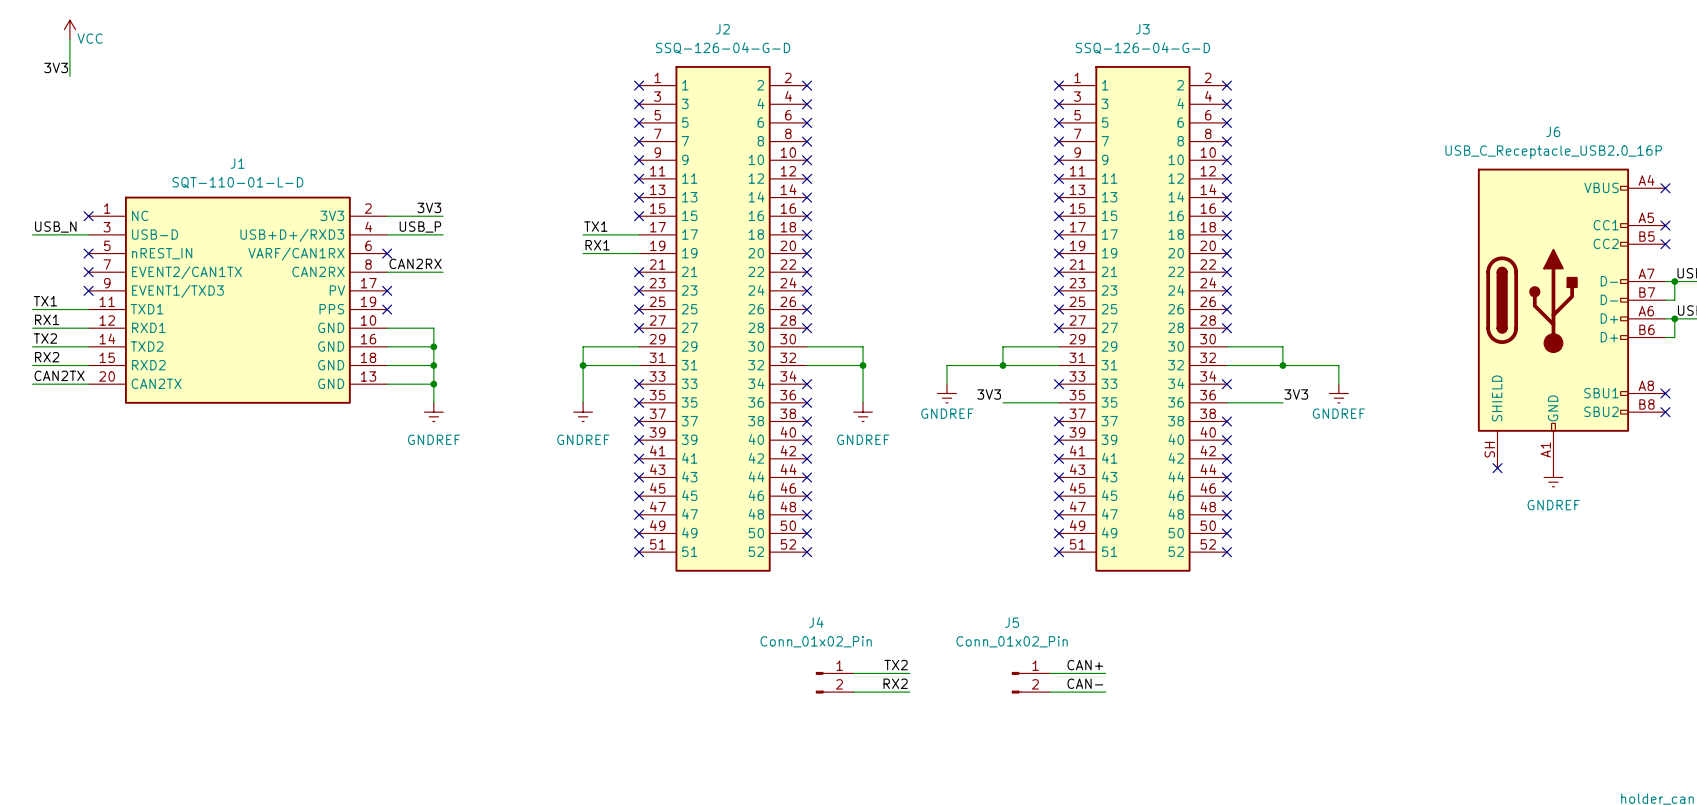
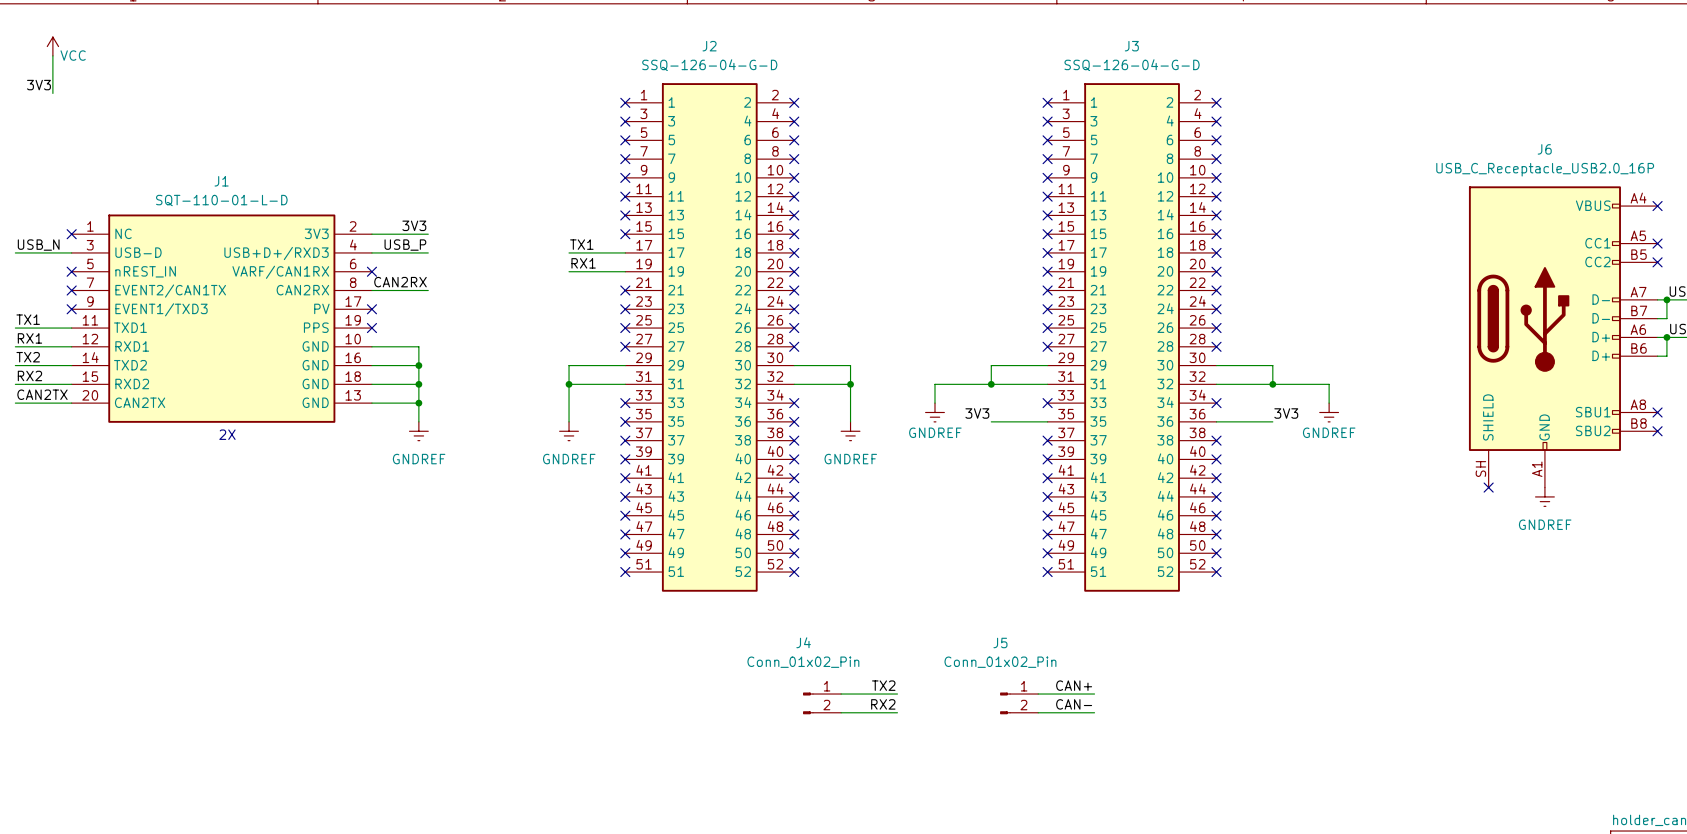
text: none -> 2X (227, 434)

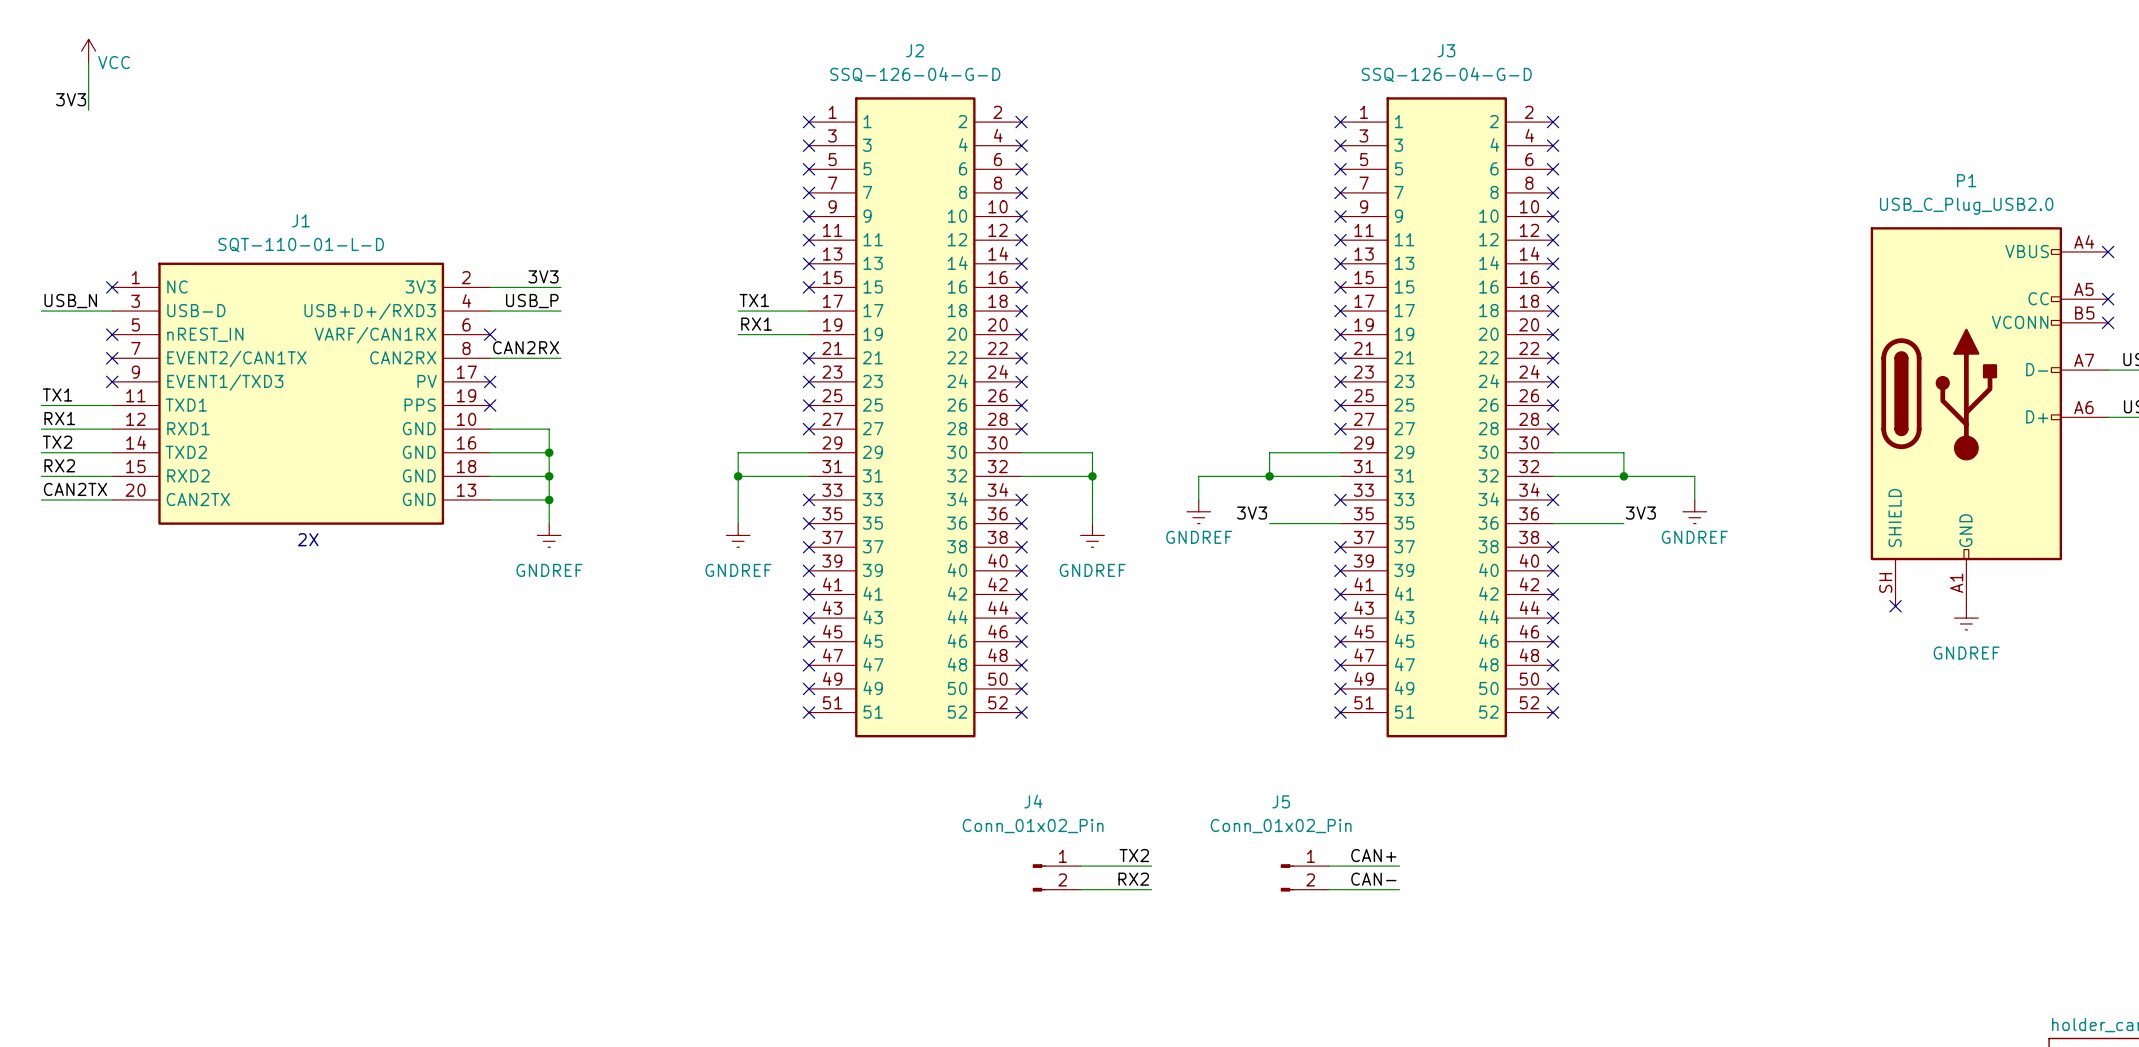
wire: (1666, 299) (1666, 318) (1657, 318) -> none
junction: (1666, 299) -> none
J6: USB_C_Receptacle_USB2.0_16P (1563, 336) -> none
P1: none -> USB_C_Plug_USB2.0 (1989, 416)
wire: (1666, 337) (1666, 356) (1657, 356) -> none
junction: (1666, 337) -> none
no-connect mark: (1657, 412) -> none
no-connect mark: (1657, 431) -> none

